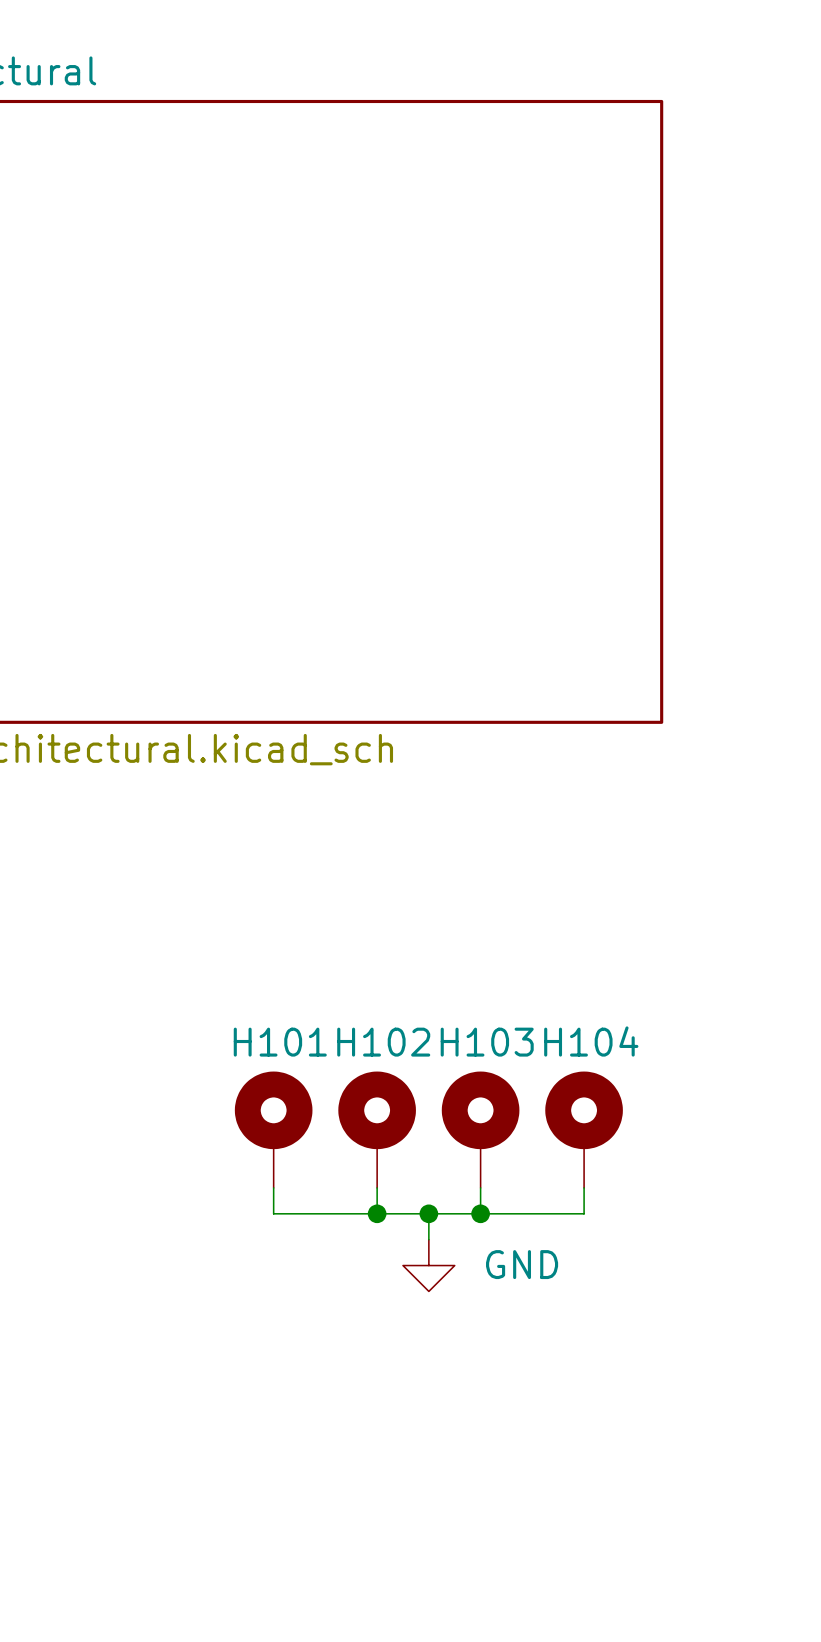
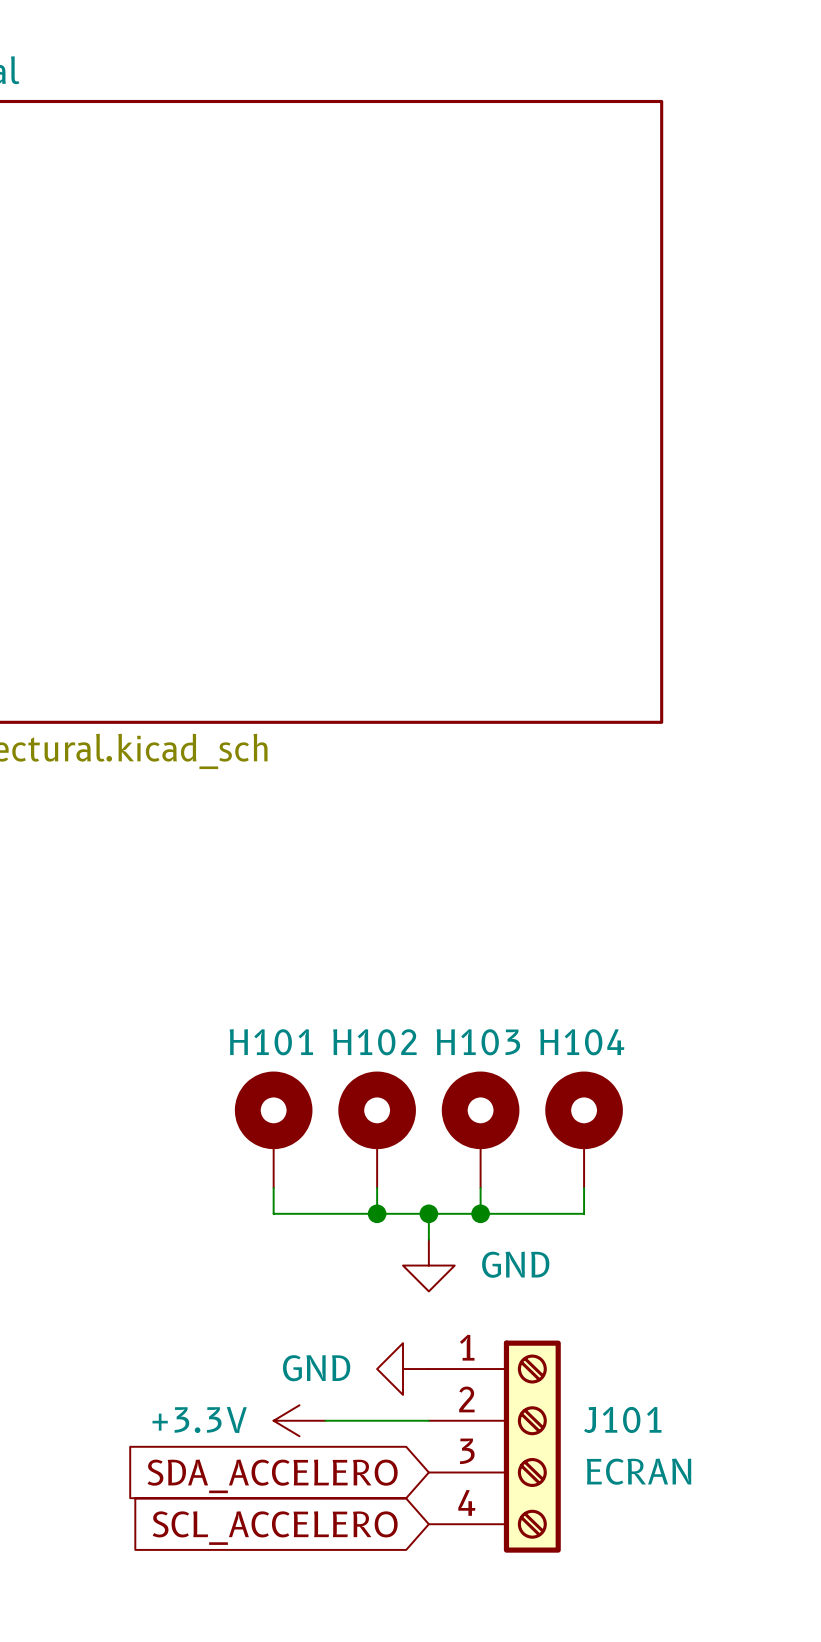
power symbol: none -> GND (402, 1369)
power symbol: none -> +3.3V (299, 1420)
wire: none -> (325, 1420) (428, 1420)
J101: none -> ECRAN (494, 1446)
global label: none -> SDA_ACCELERO (272, 1476)
global label: none -> SCL_ACCELERO (275, 1528)

